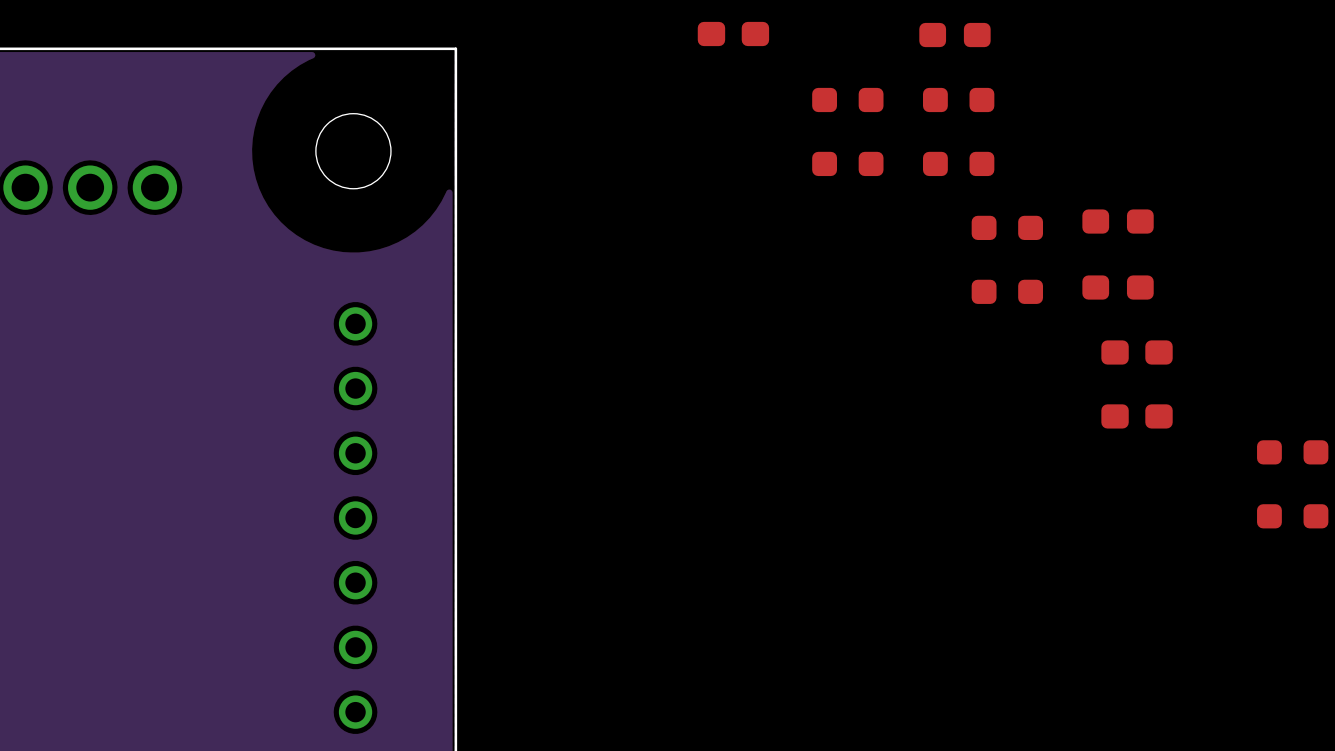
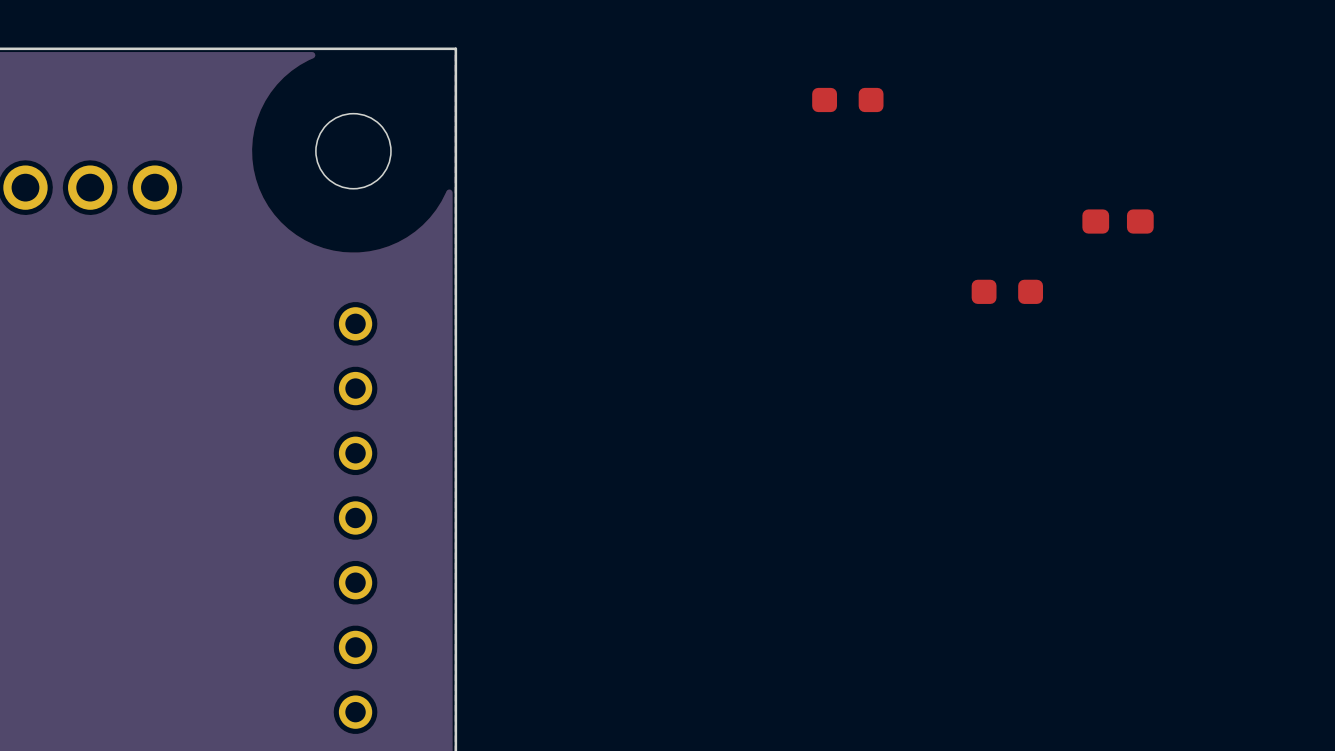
part: (733, 34) -> none
part: (954, 35) -> none
part: (958, 99) -> none
part: (847, 163) -> none
part: (958, 163) -> none
part: (1007, 227) -> none
part: (1118, 287) -> none
part: (1137, 352) -> none
part: (1137, 416) -> none
part: (1292, 452) -> none
part: (1292, 516) -> none

